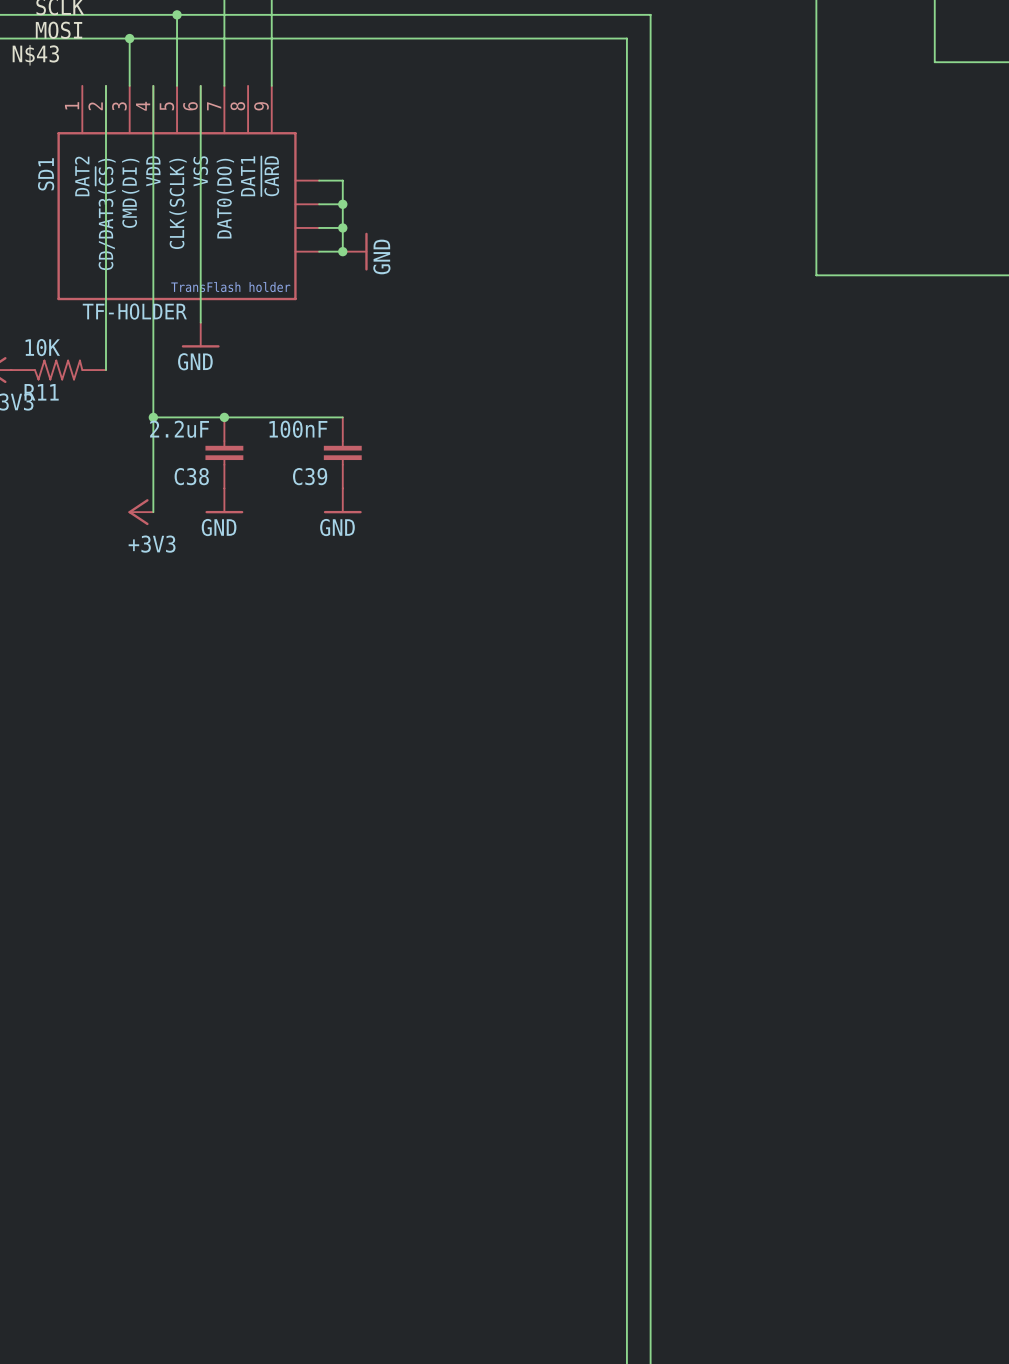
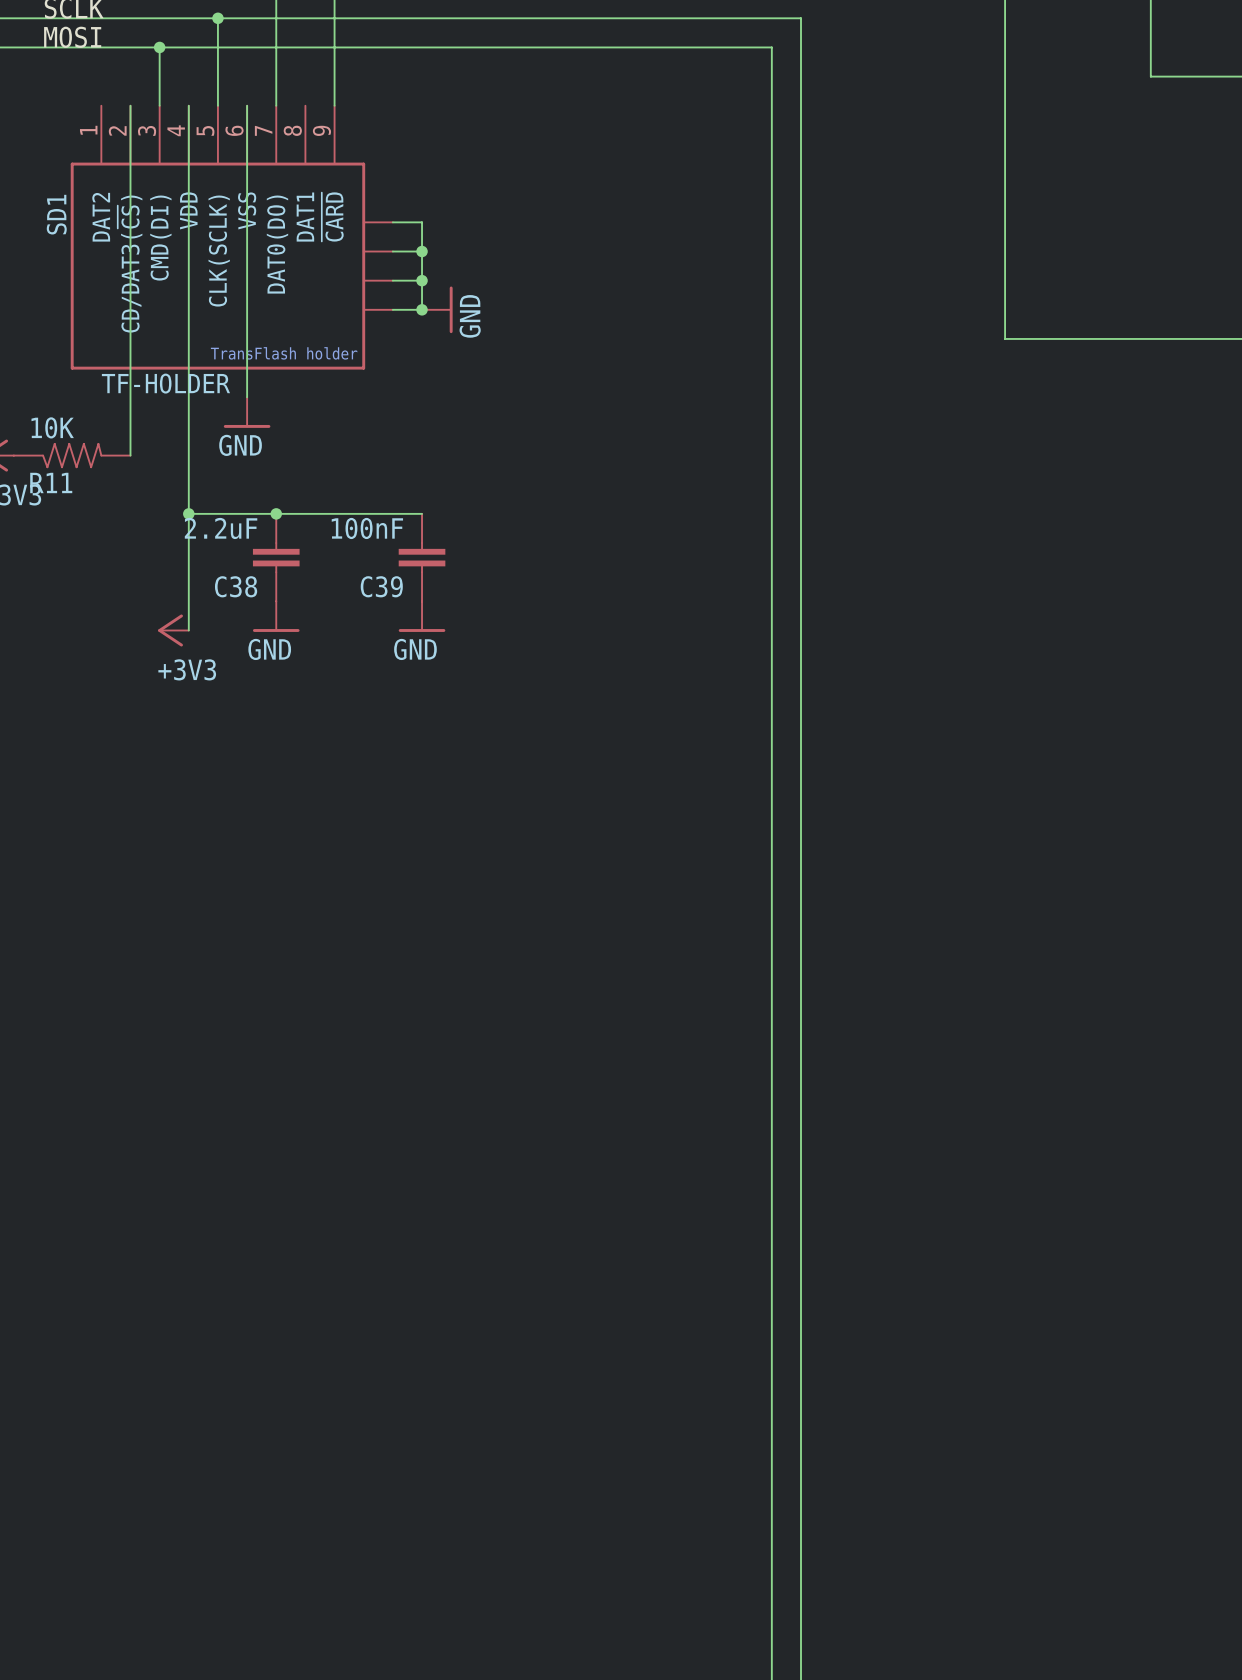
label: N$43 (35, 55) -> none

